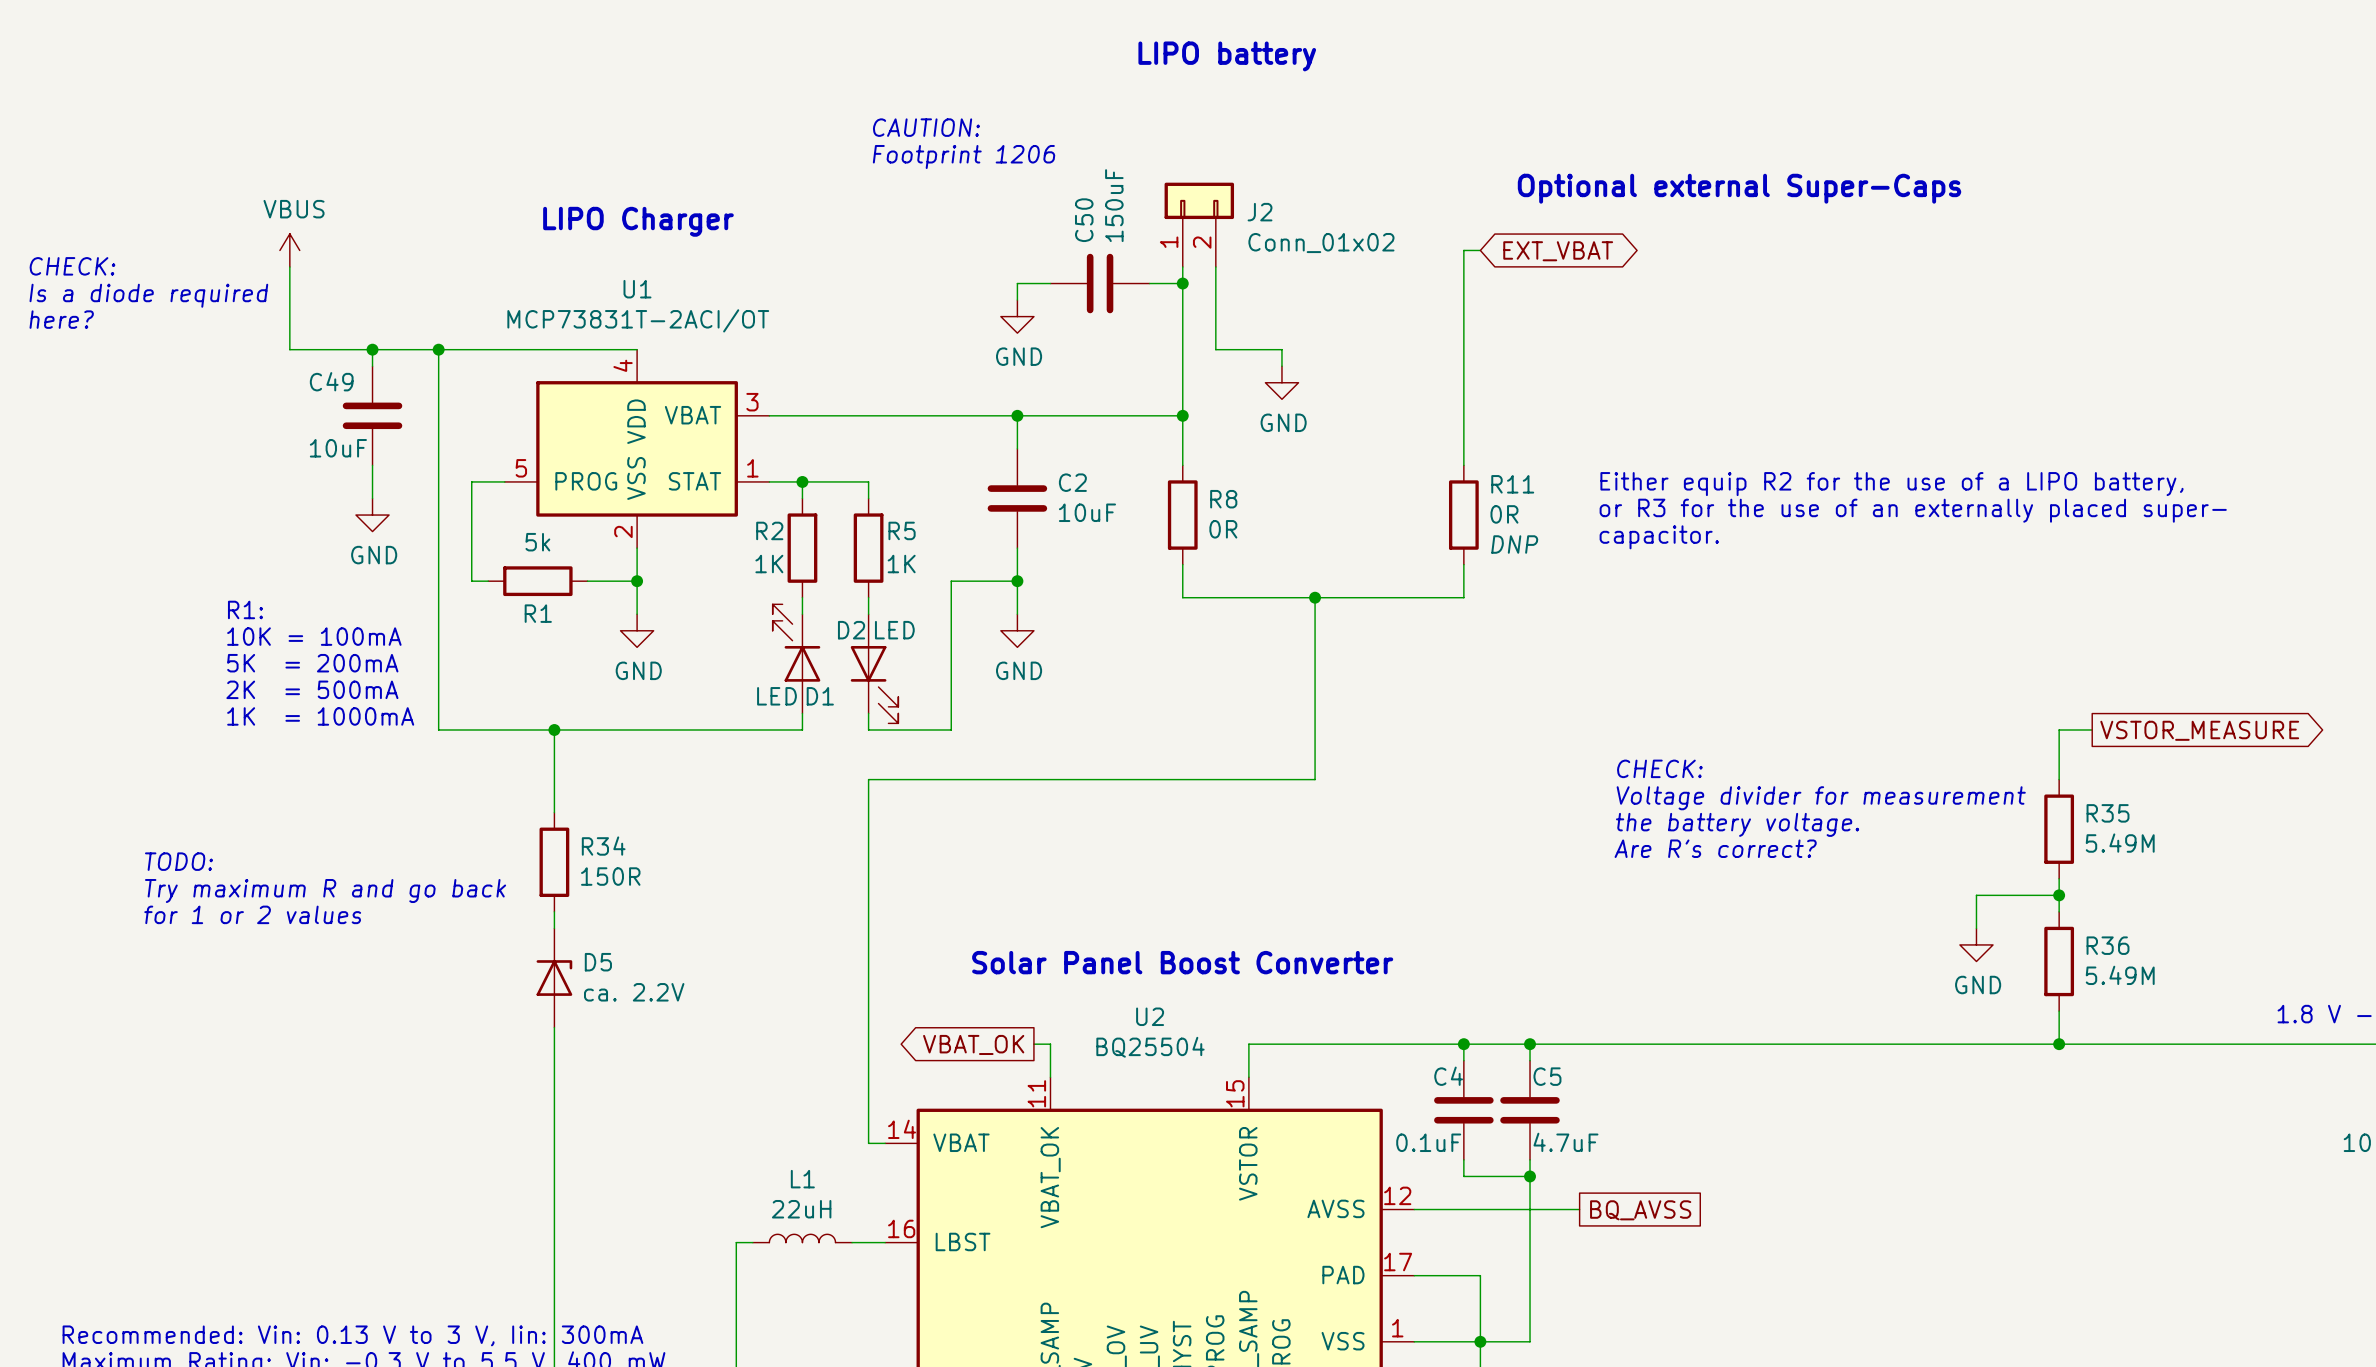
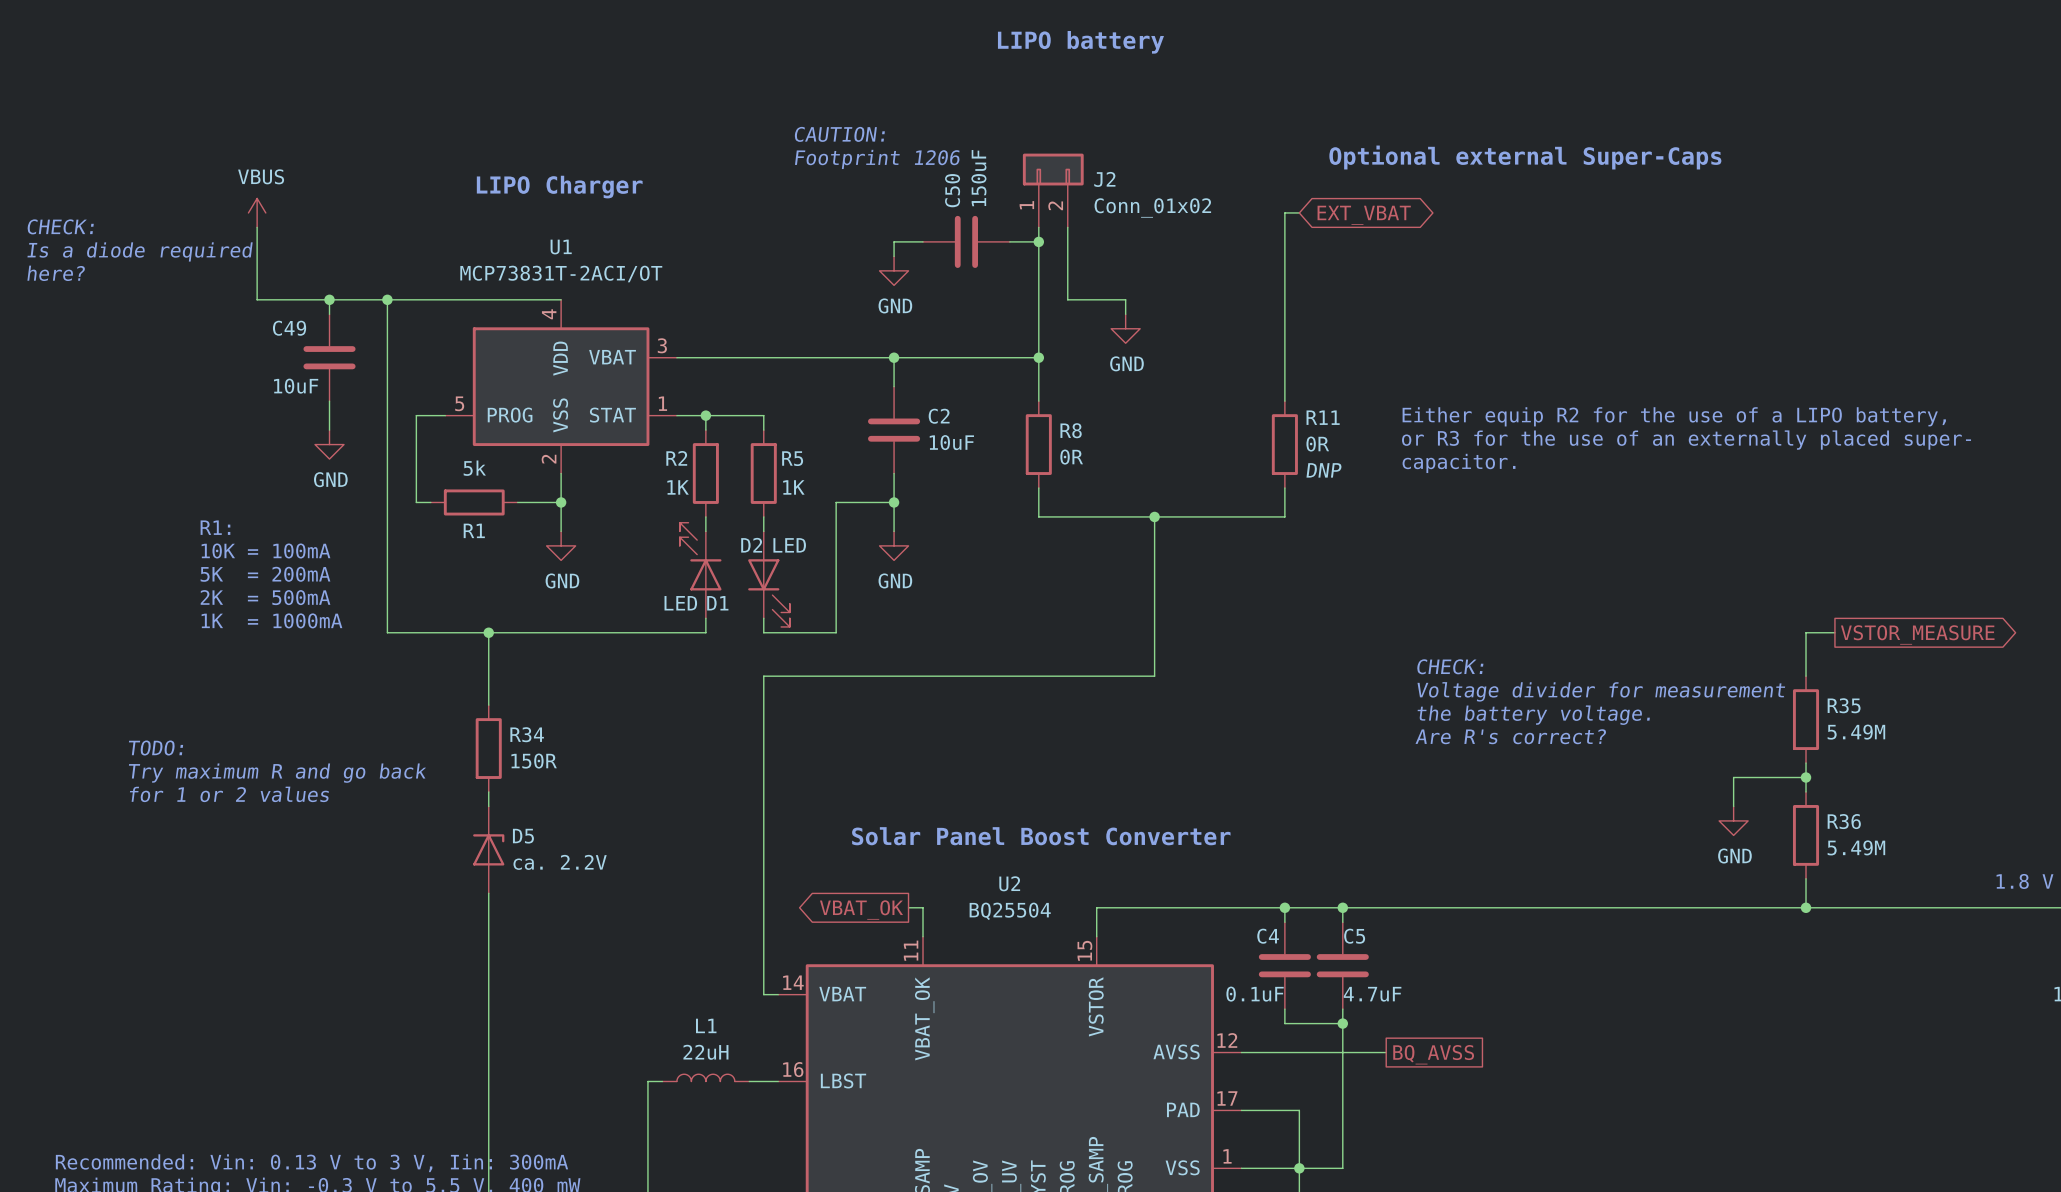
text position: CAUTION: (926, 127) -> CAUTION: (839, 134)
text position: Footprint 1206 (964, 156) -> Footprint 1206 (877, 159)

